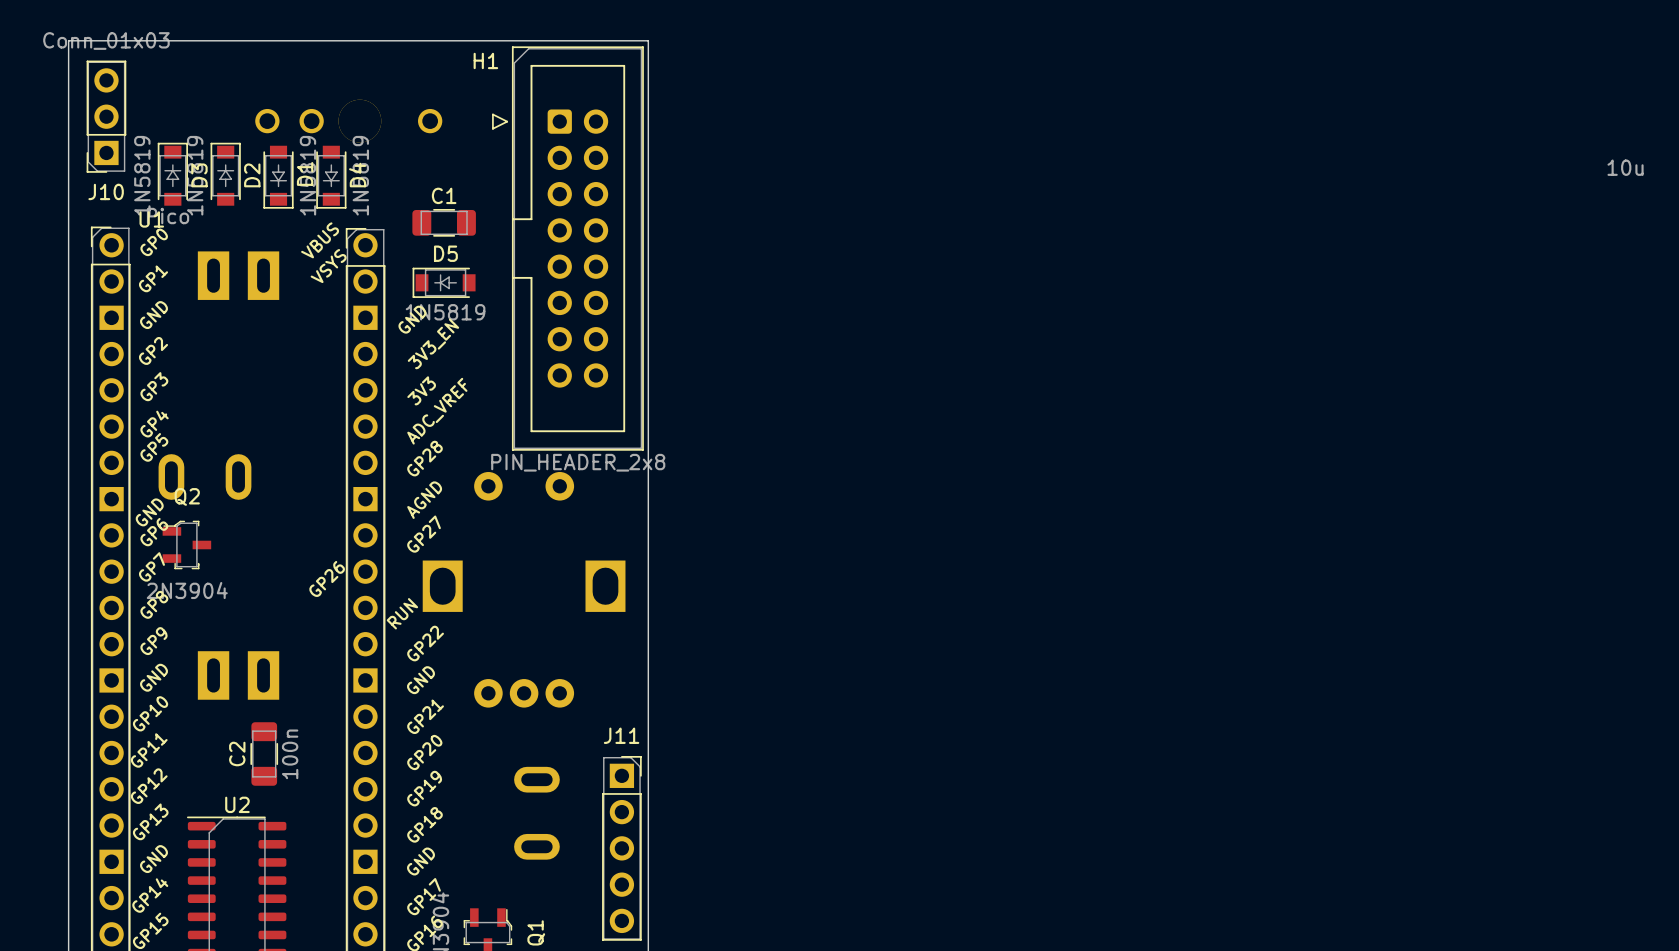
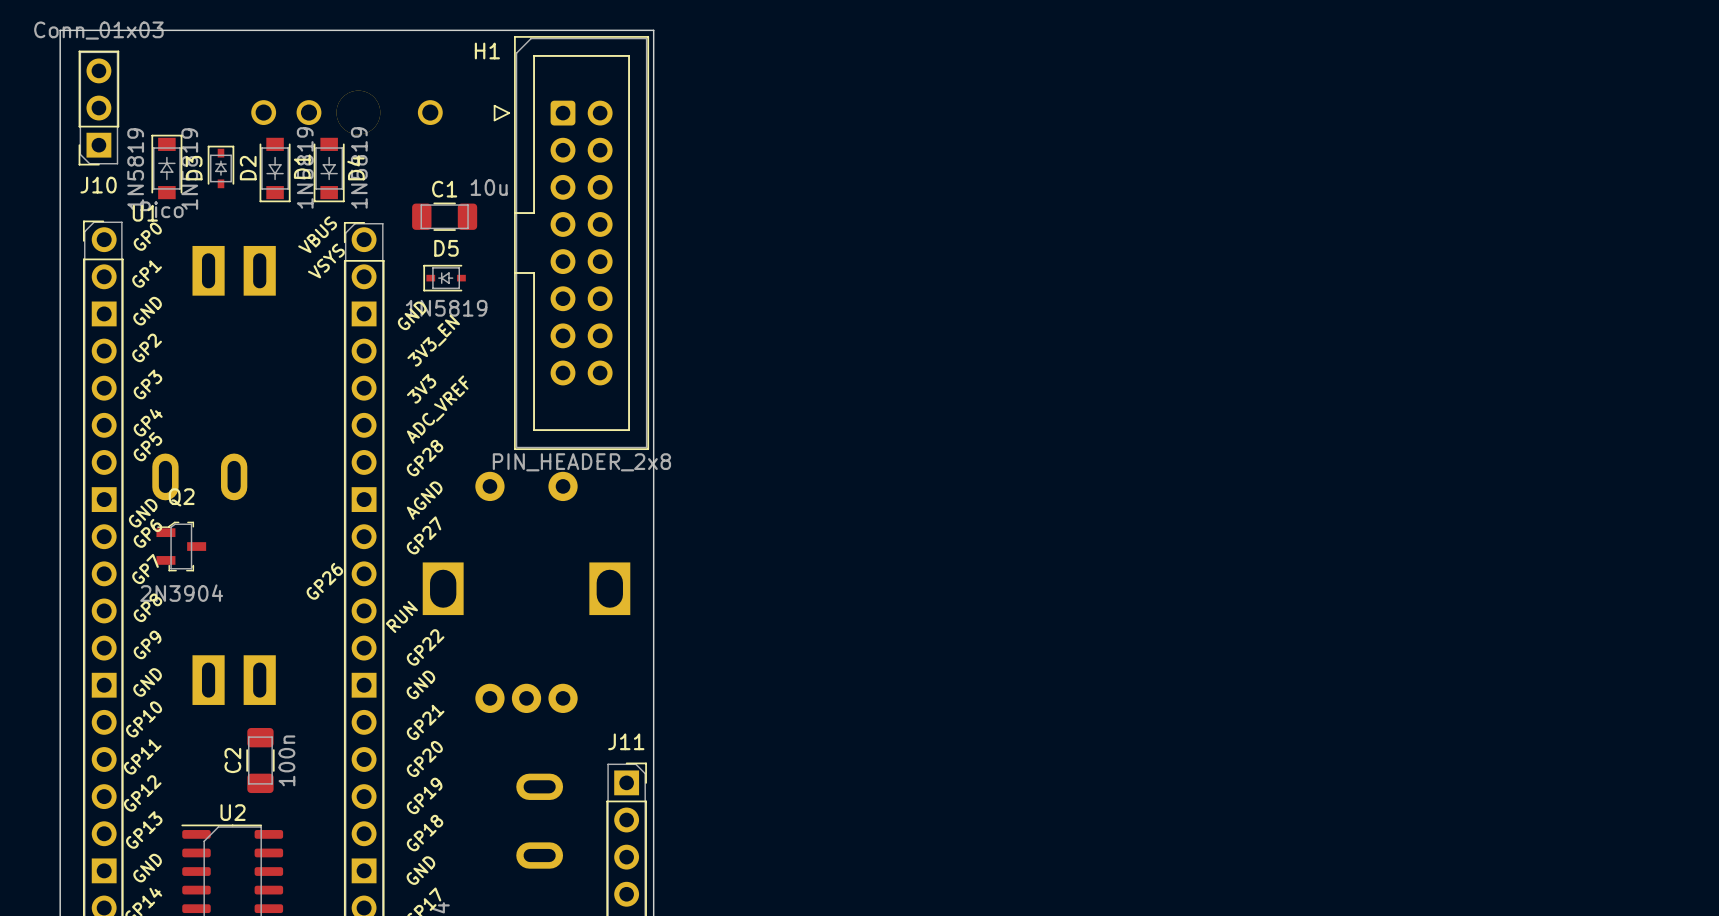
D2 footprint: [210, 142, 241, 206] -> [207, 145, 235, 189]
C1 value position: 10u (1625, 167) -> 10u (489, 187)
D5 footprint: [412, 267, 476, 298] -> [423, 264, 466, 292]

